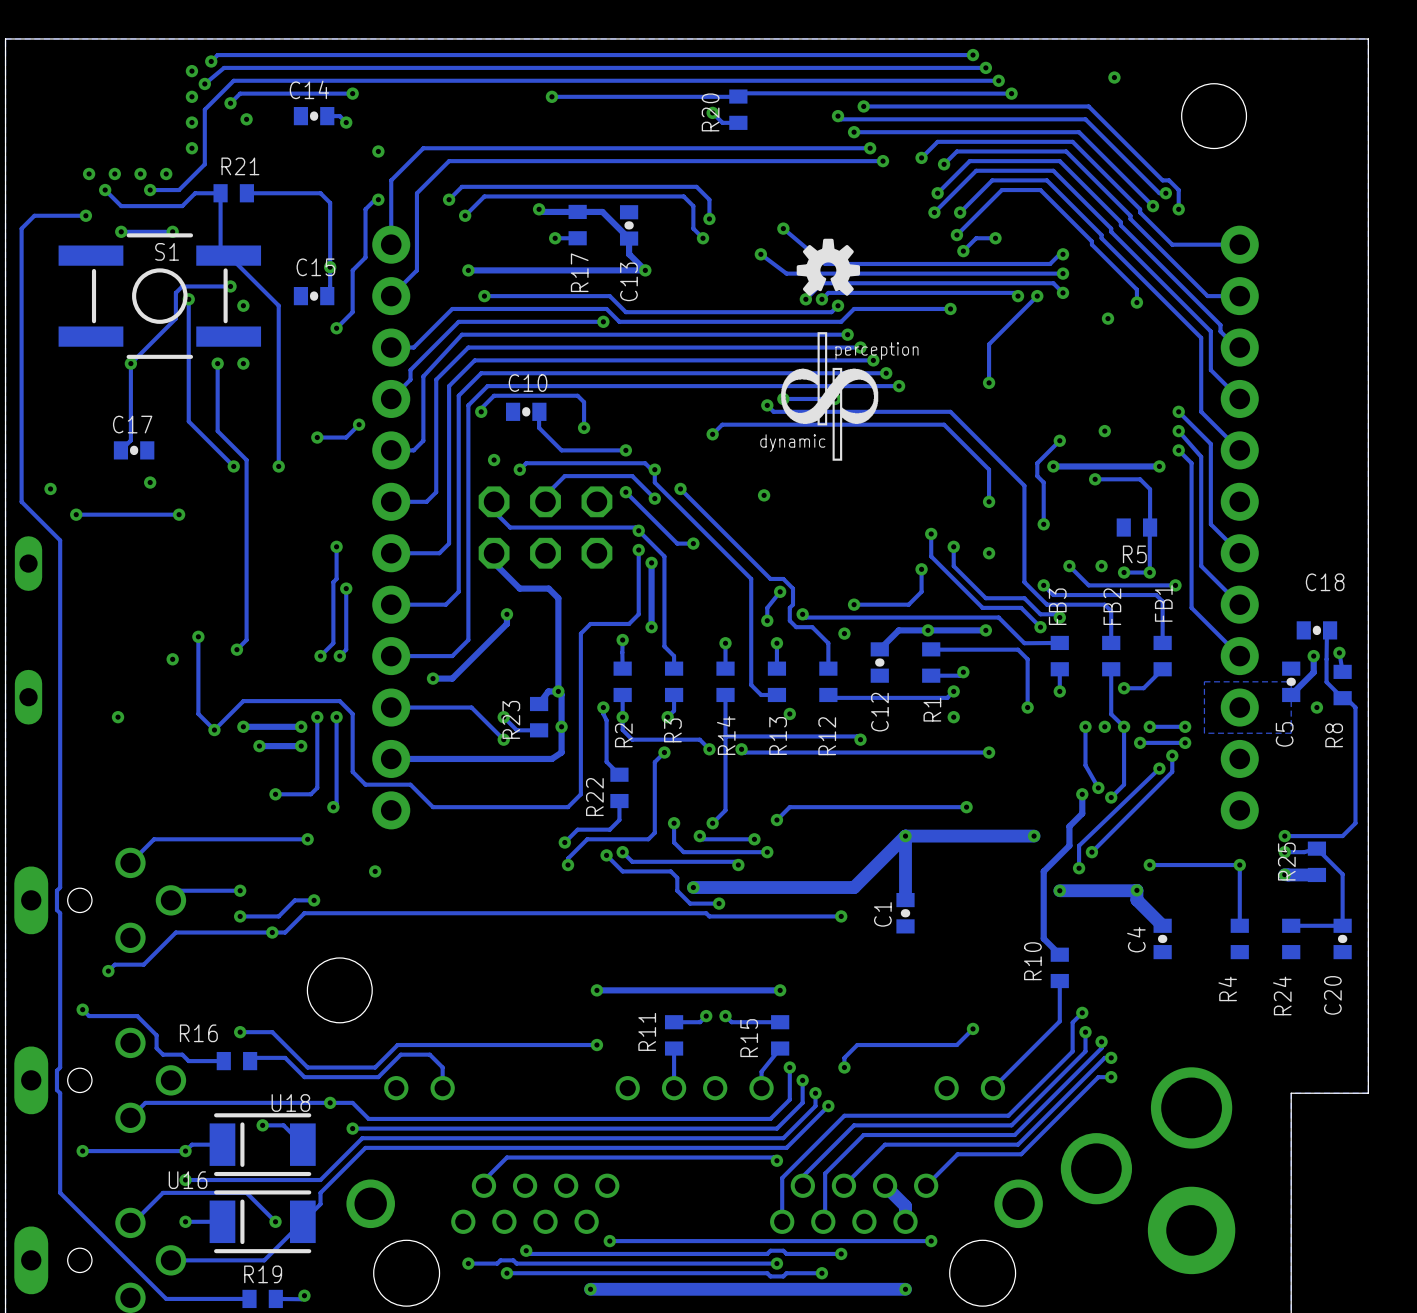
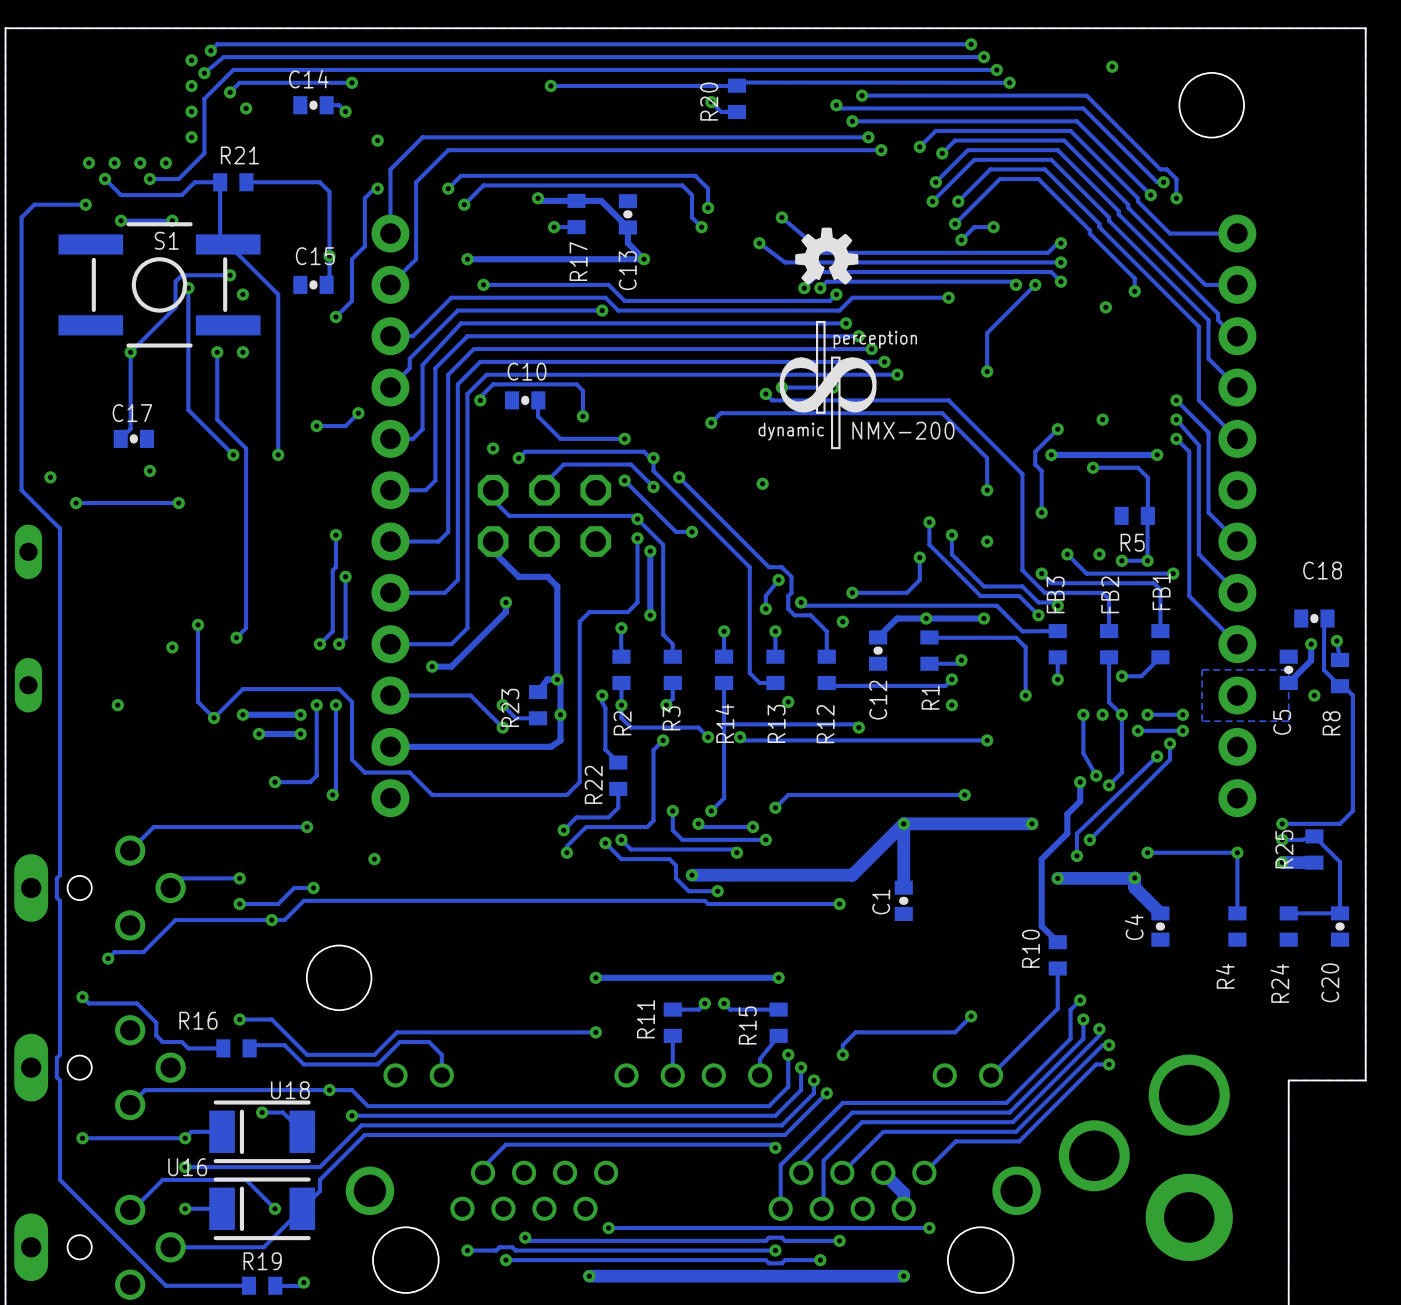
drawing: none -> [852, 421, 955, 440]

